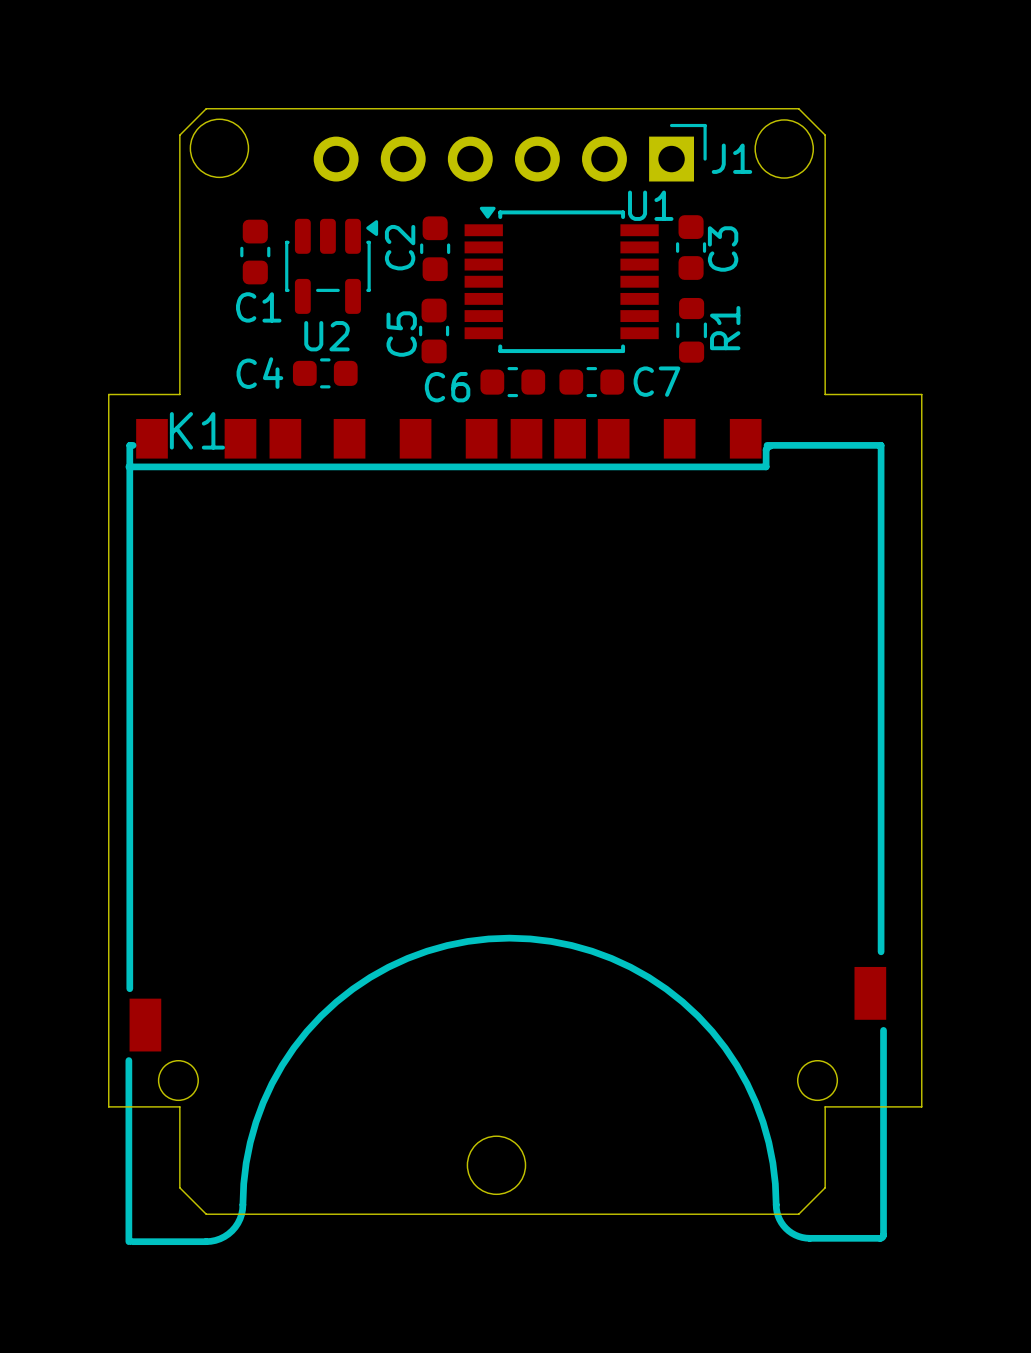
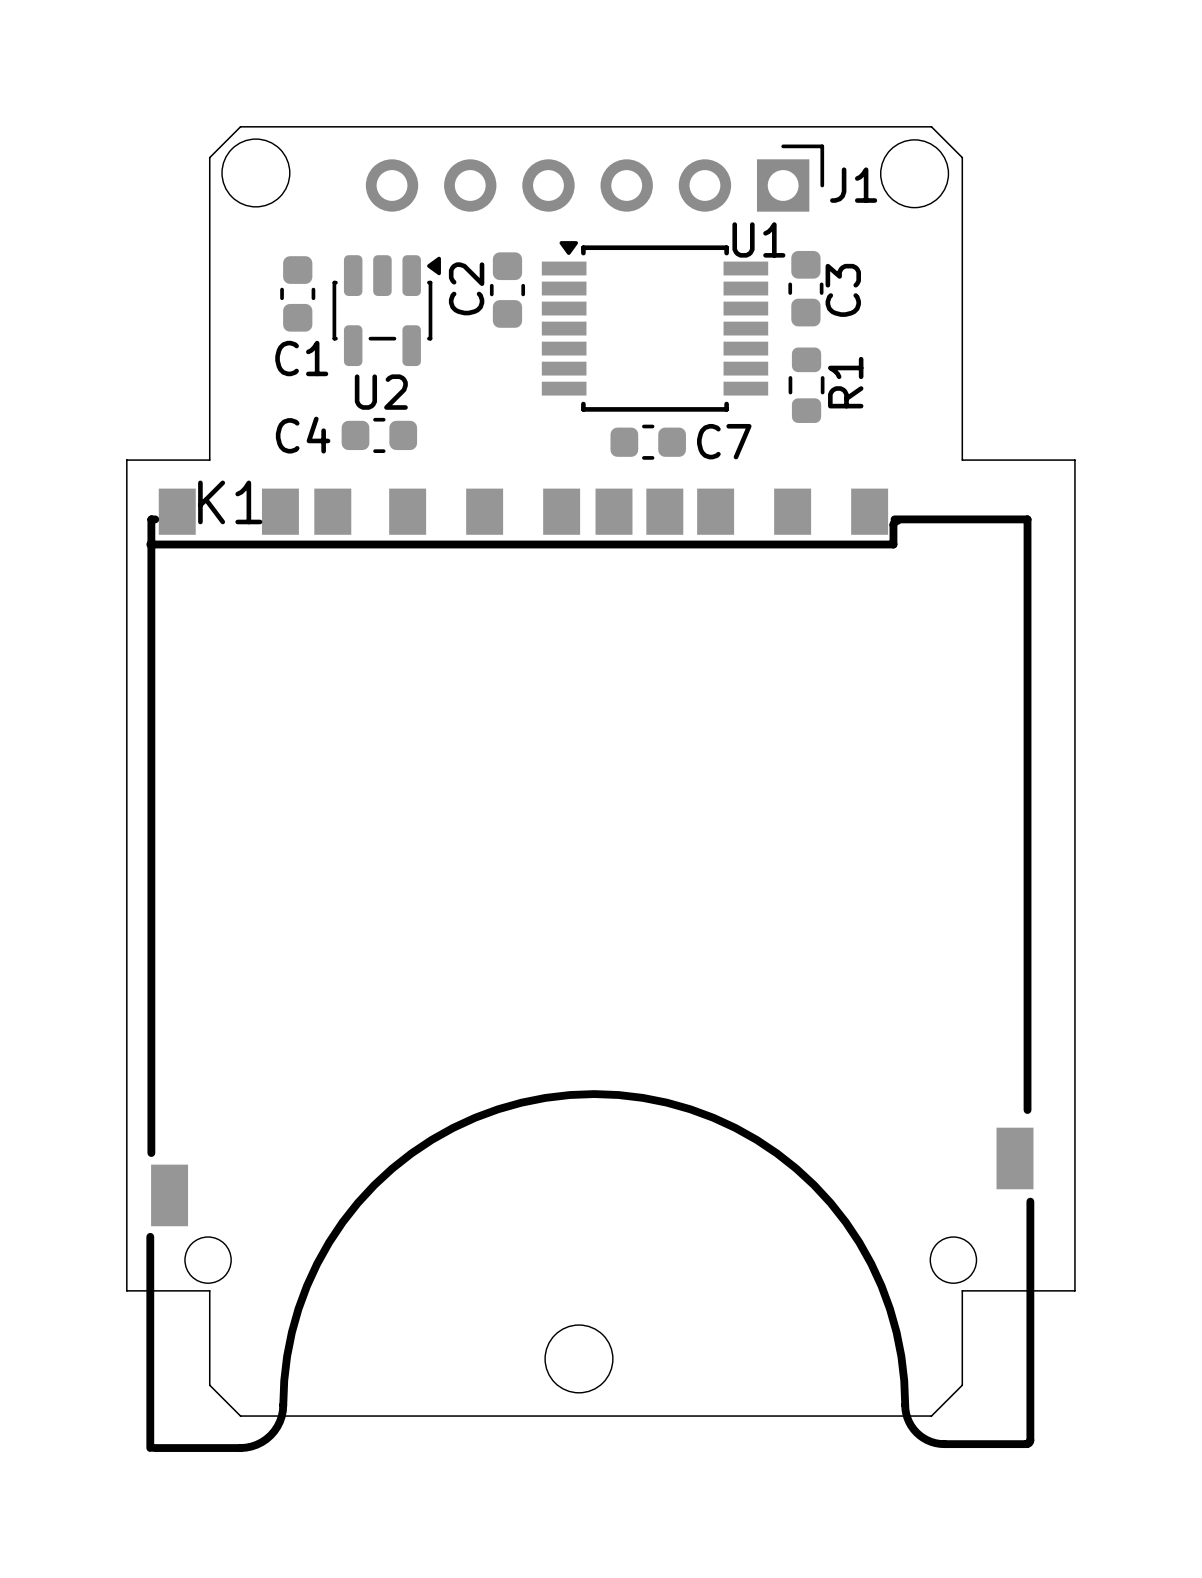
C5: (434, 330) -> none
C6: (512, 382) -> none
C7 position: (591, 382) -> (648, 442)

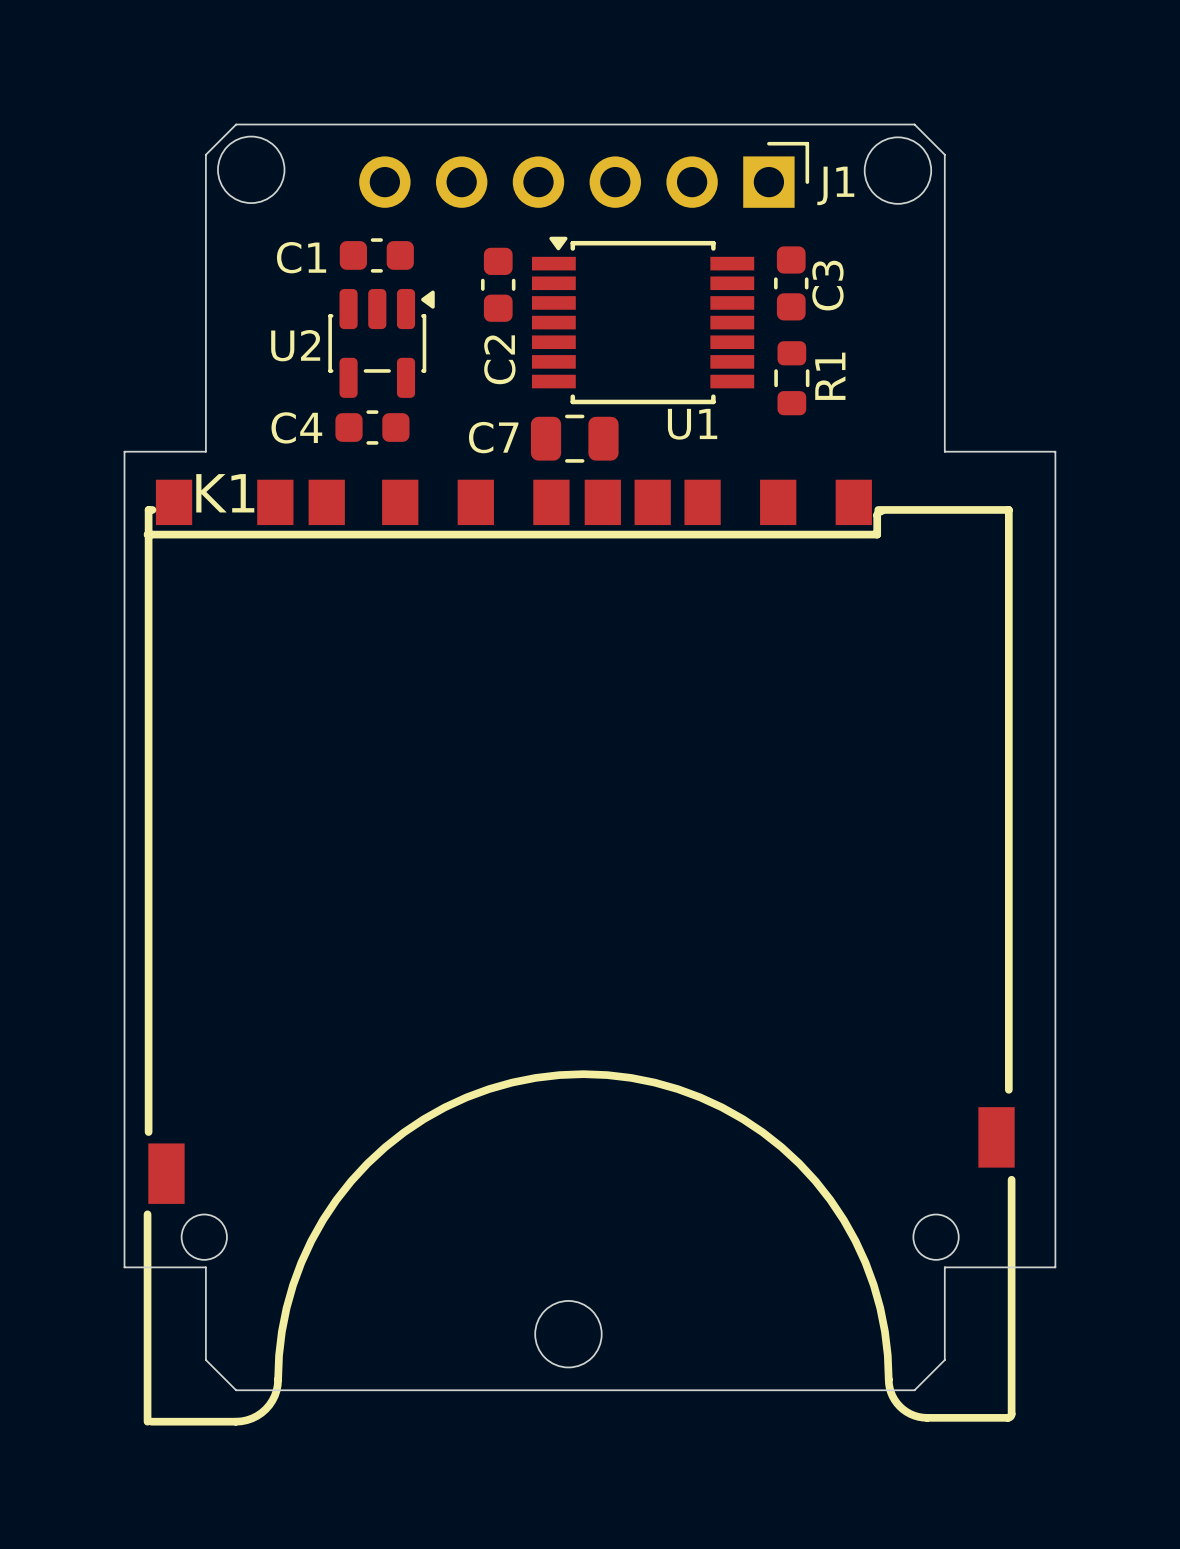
U1 name position: U1 (758, 239) -> U1 (692, 424)
C2 name position: C2 (466, 288) -> C2 (499, 359)
C1 rotation: 0° (297, 293) -> 90° clockwise (376, 255)
C1 position: (297, 293) -> (376, 255)
U1 position: (386, 310) -> (381, 343)
U2 name position: U2 (381, 392) -> U2 (295, 345)
C7 footprint: [610, 424, 686, 460] -> [530, 414, 619, 463]
C7 name position: C7 (724, 441) -> C7 (493, 437)

